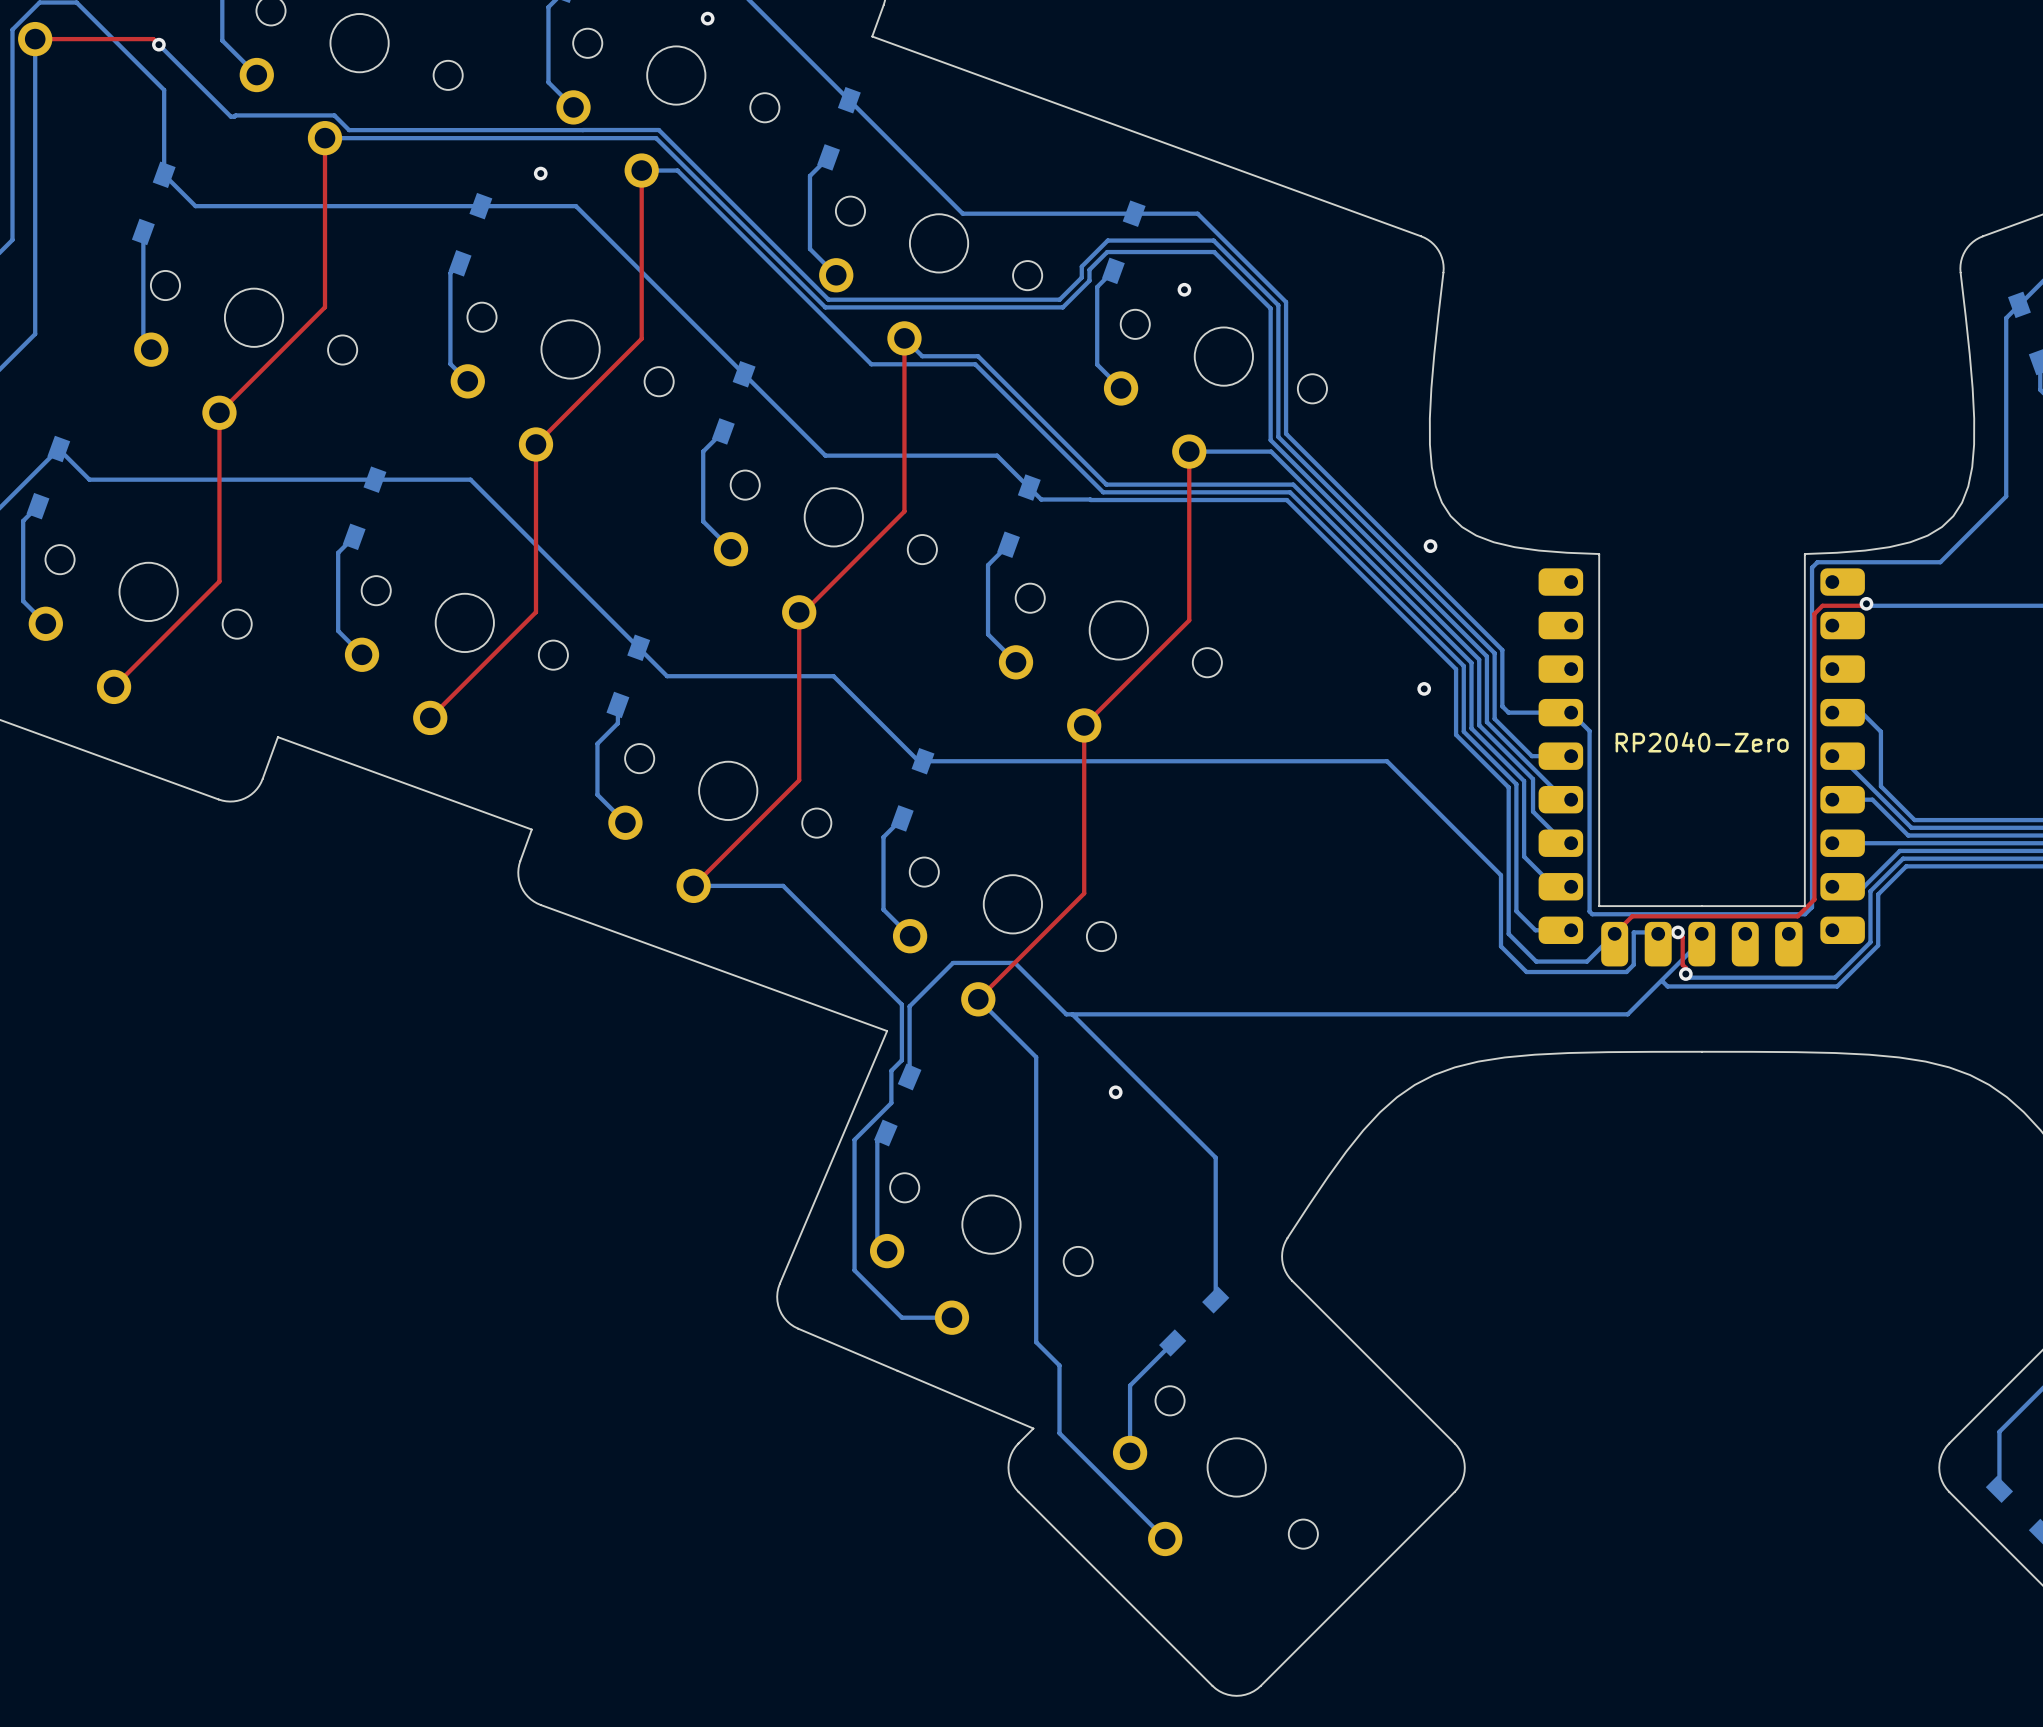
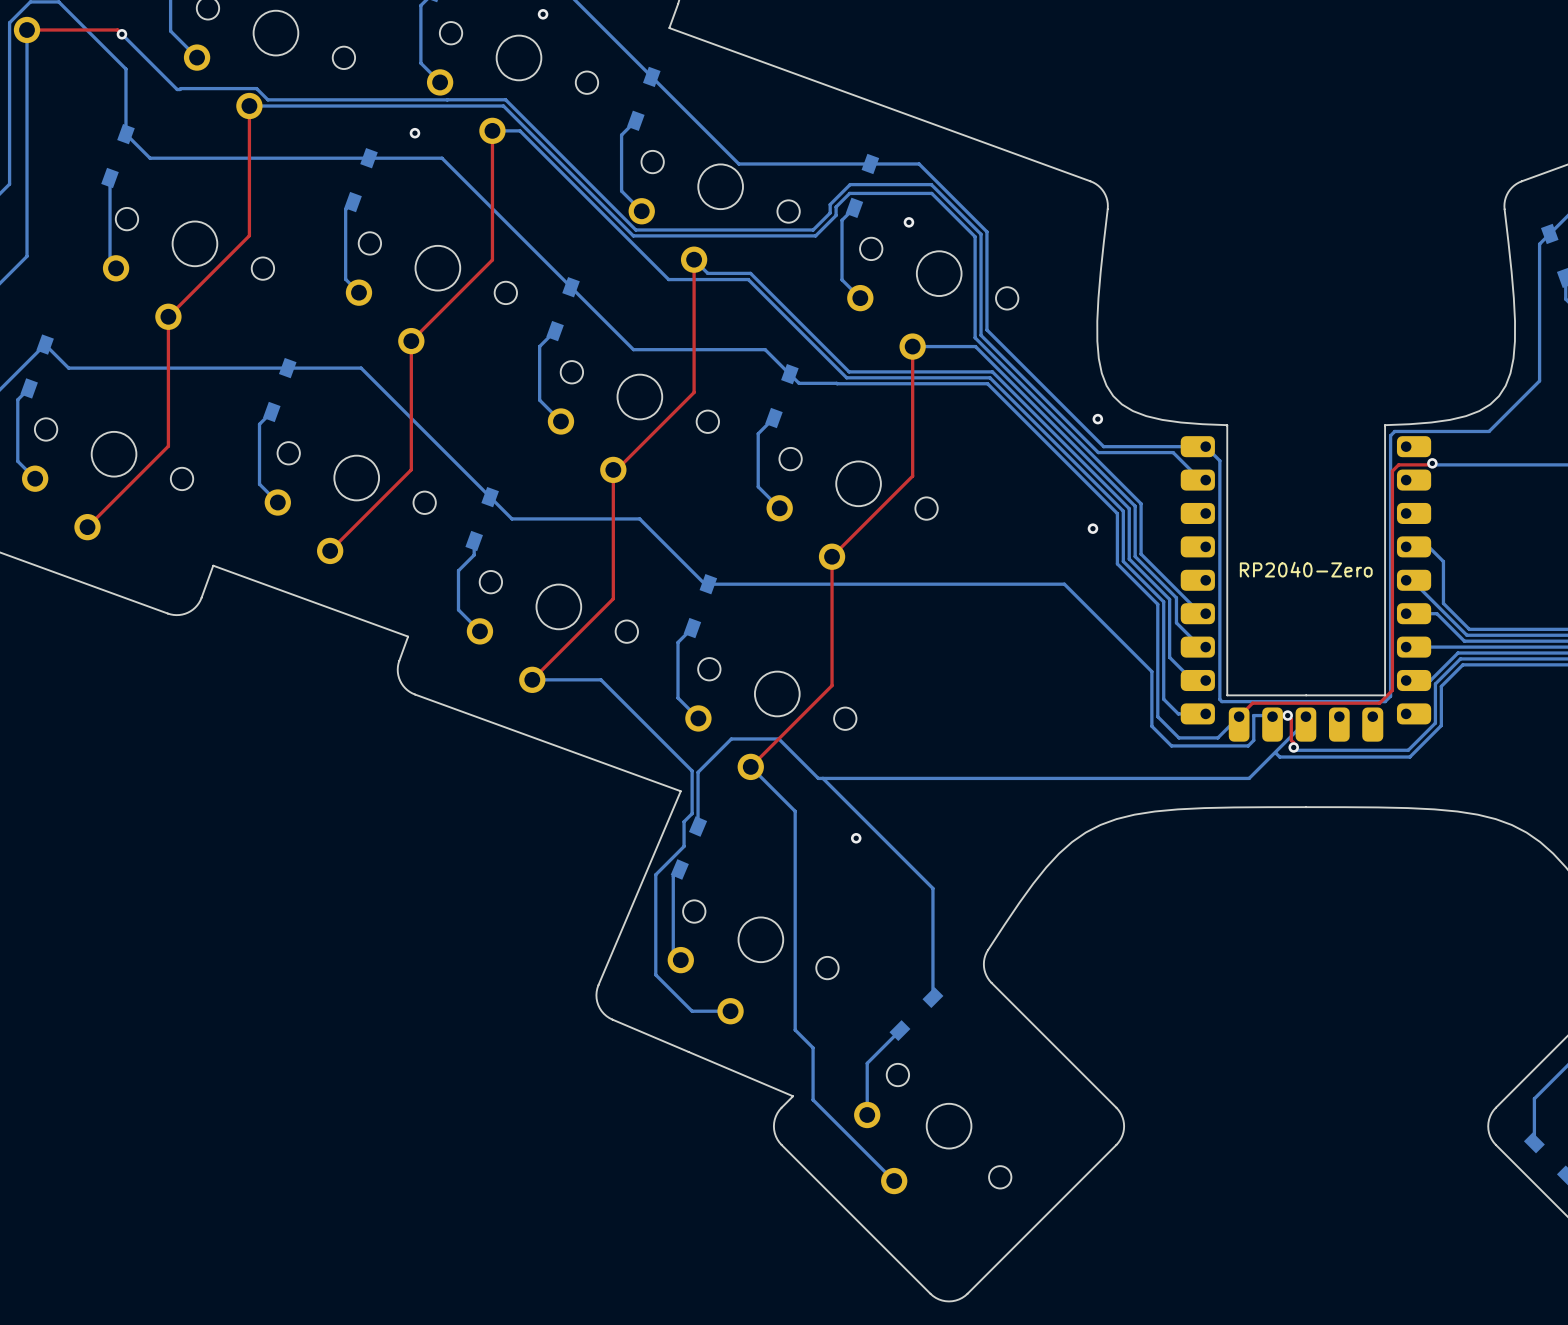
bottom track: (1286, 429) (1286, 433) (1502, 650) (1502, 706) (1508, 712) (1571, 712) (1589, 731) -> (986, 329) (1103, 446) (1205, 446) (1219, 460) (1219, 561)
bottom track: (1431, 589) (1494, 653) (1494, 718) (1531, 756) (1571, 756) -> (1098, 452) (1173, 452) (1200, 480)

